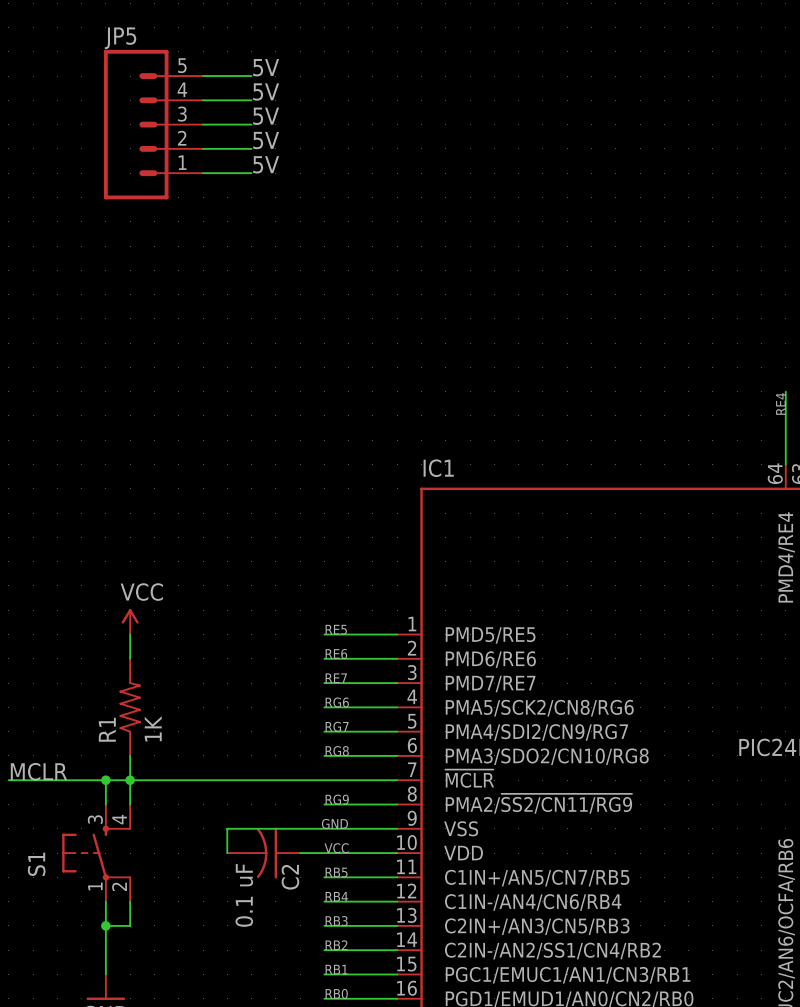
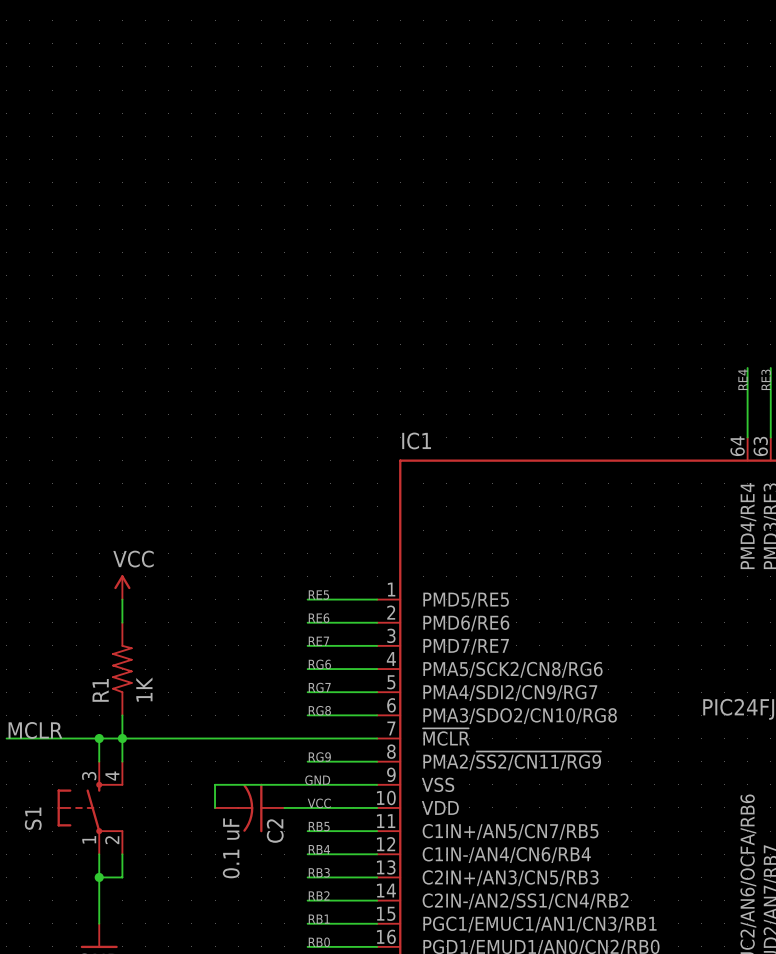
label: 5V (266, 67) -> none
wire: (203, 76) (251, 76) -> none
label: 5V (266, 91) -> none
wire: (203, 100) (251, 100) -> none
label: 5V (266, 116) -> none
JP5: (153, 124) -> none
wire: (203, 124) (251, 124) -> none
label: 5V (266, 140) -> none
wire: (203, 148) (251, 148) -> none
label: 5V (266, 164) -> none
wire: (203, 173) (251, 173) -> none

